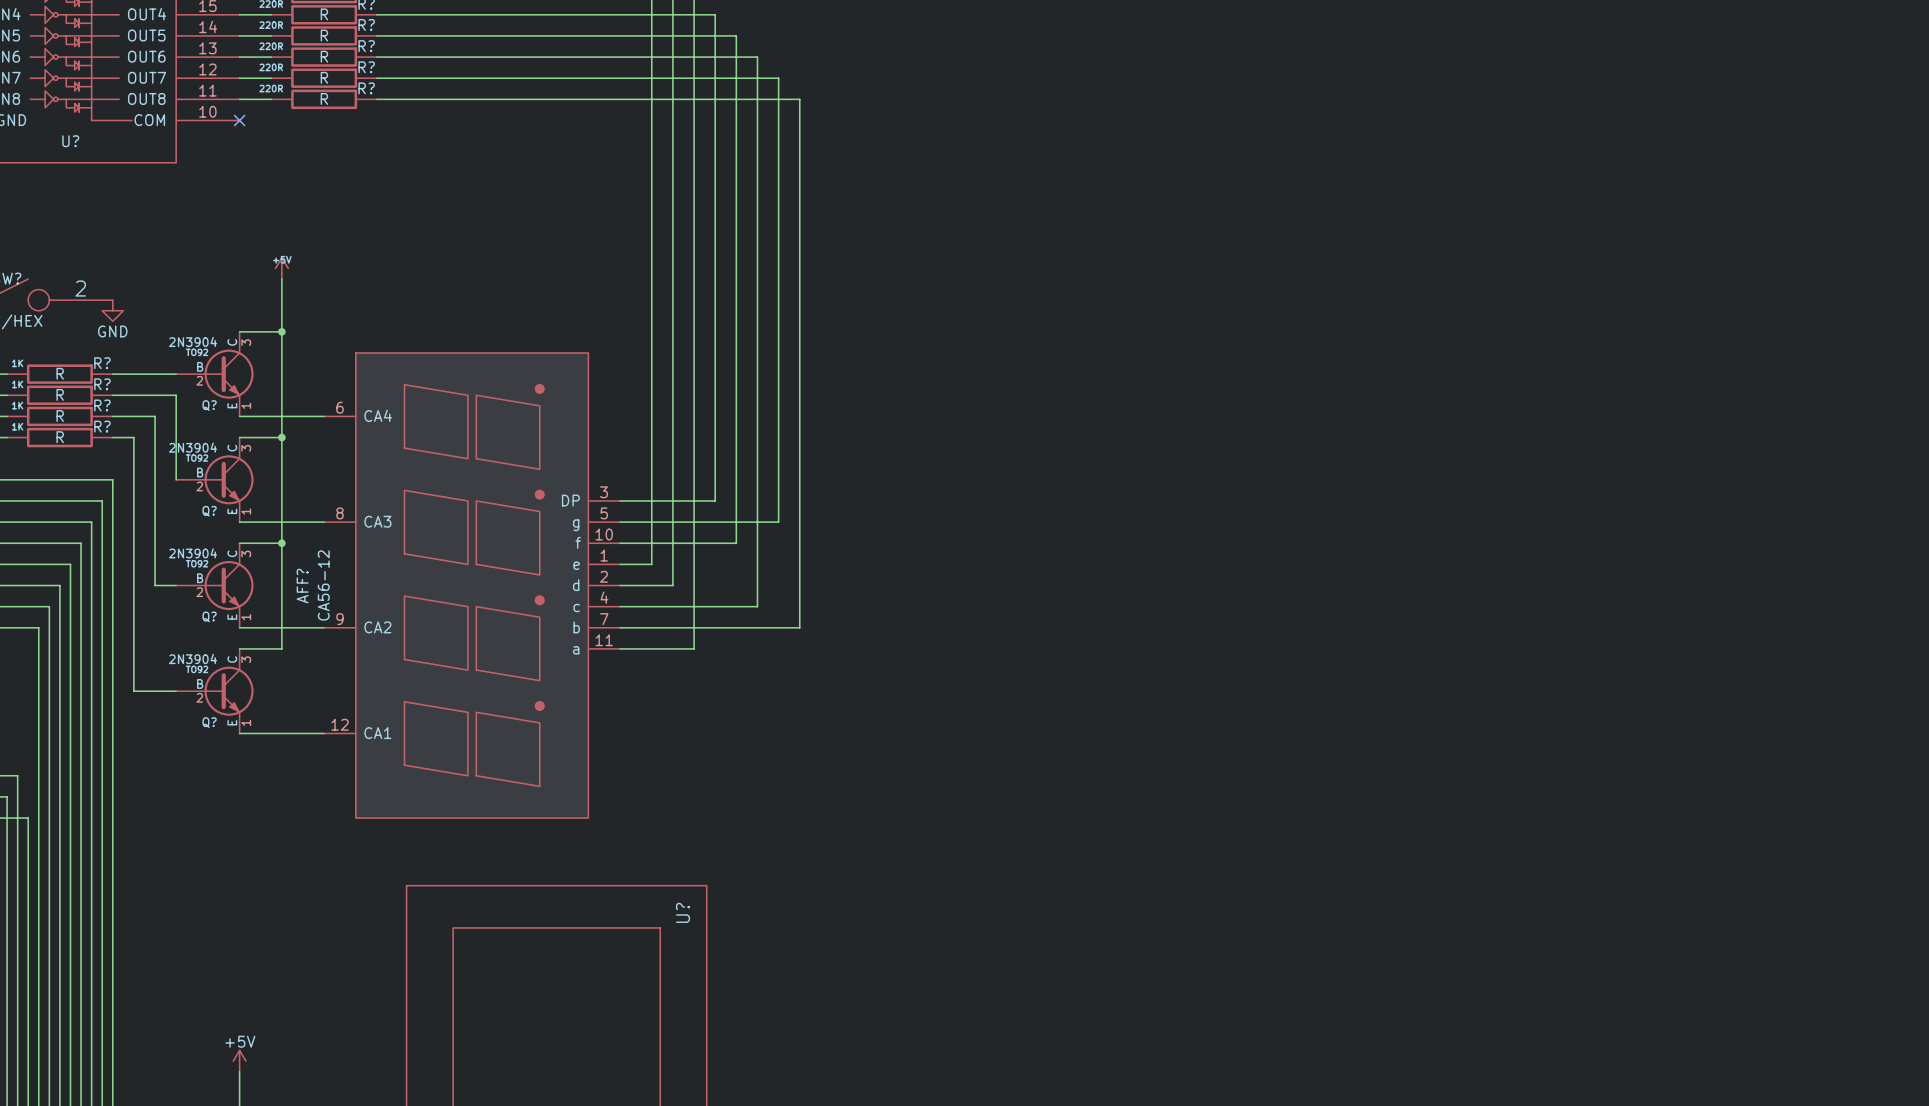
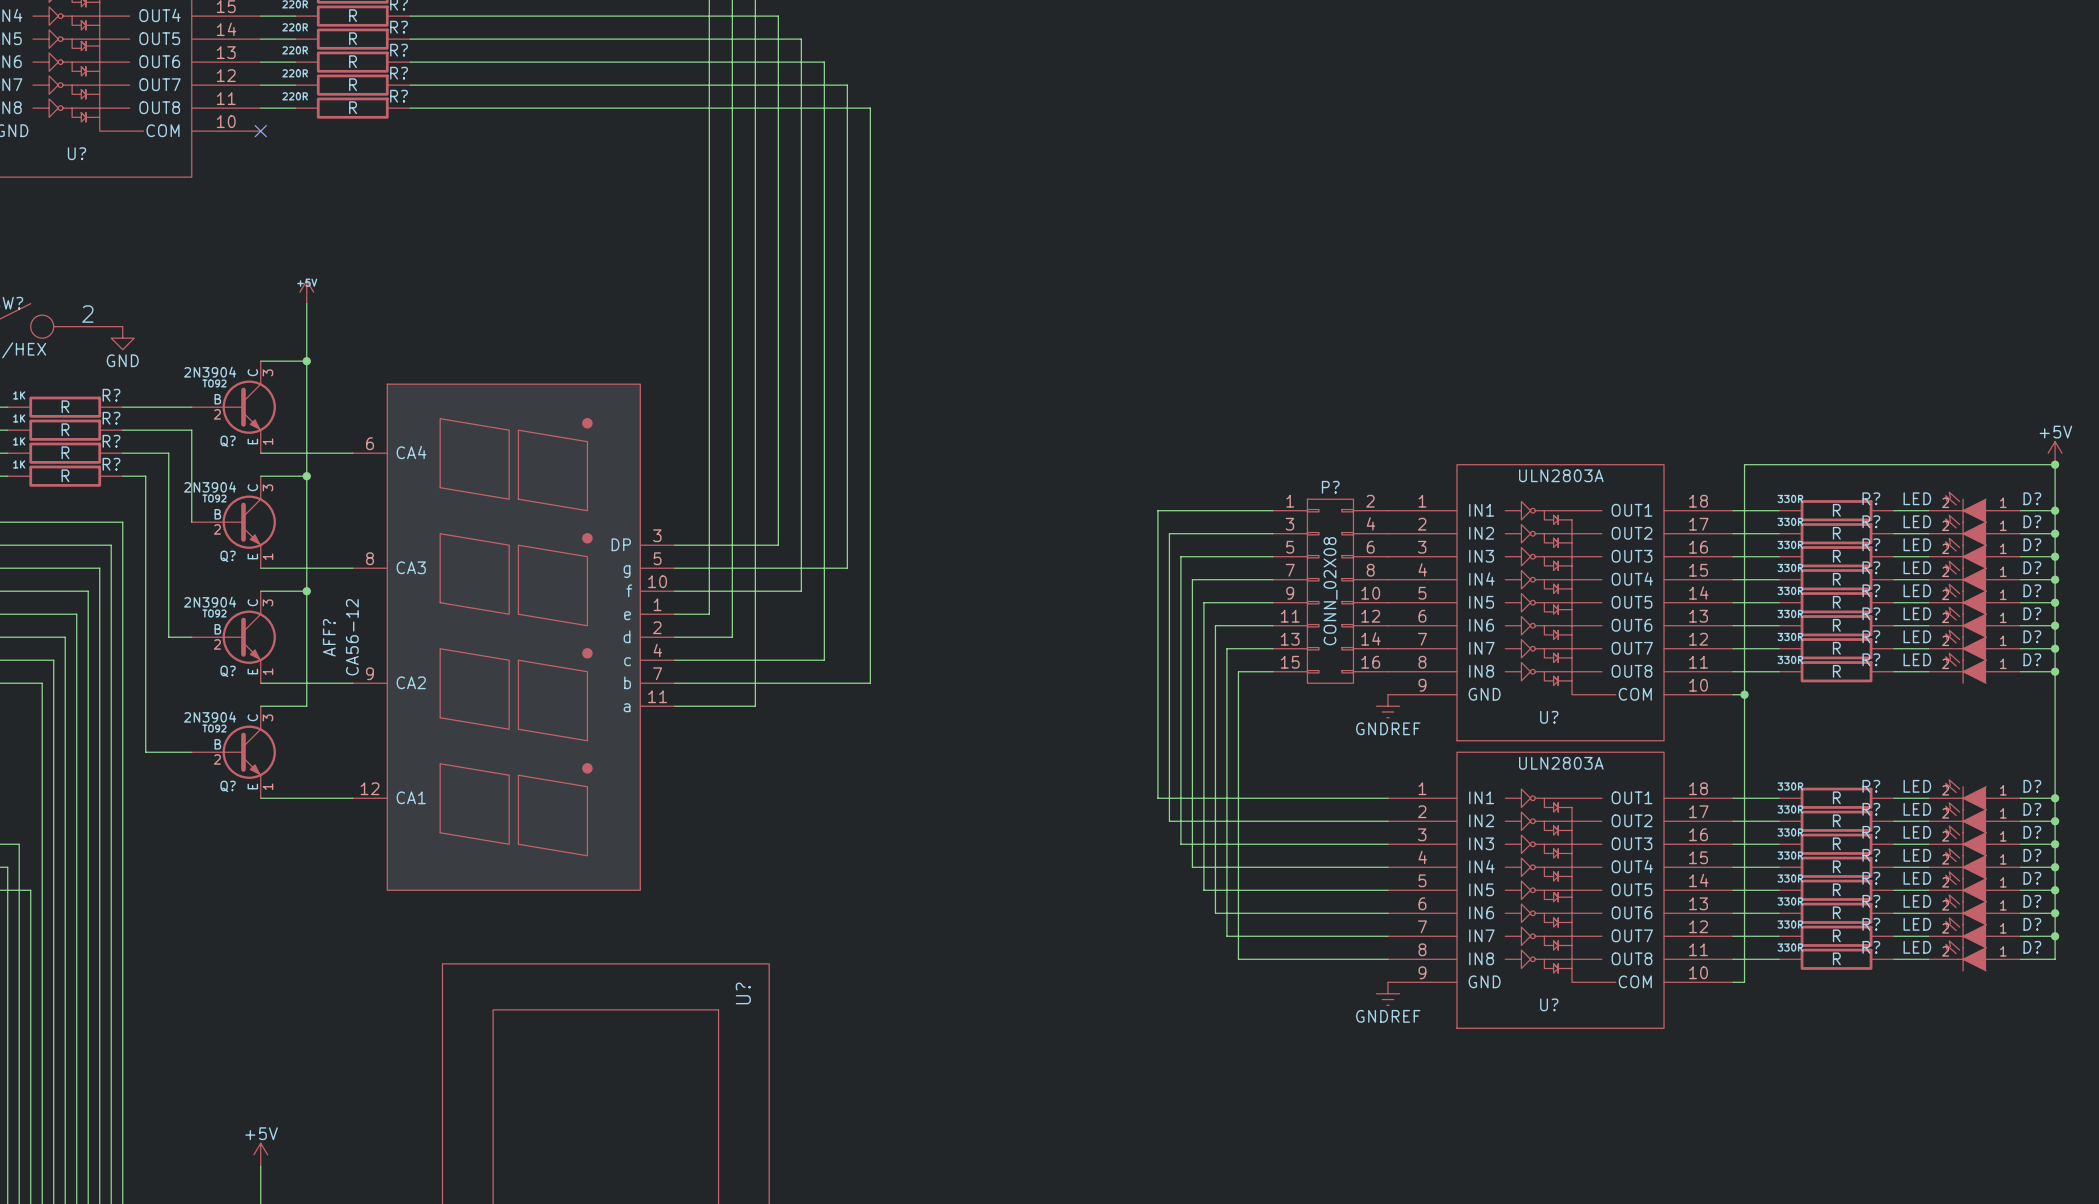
power symbol: none -> +5V (2055, 453)
junction: none -> (2055, 464)
D?: none -> LED (1974, 507)
wire: none -> (1272, 510) (1157, 510) (1157, 798) (1387, 798)
wire: none -> (1733, 510) (1779, 510)
R?: none -> R (1836, 510)
wire: none -> (1894, 510) (1928, 510)
wire: none -> (2020, 510) (2055, 510)
junction: none -> (2055, 510)
D?: none -> LED (1974, 530)
wire: none -> (1272, 533) (1169, 533) (1169, 821) (1387, 821)
wire: none -> (1733, 533) (1779, 533)
R?: none -> R (1836, 533)
wire: none -> (1894, 533) (1928, 533)
wire: none -> (2020, 533) (2055, 533)
junction: none -> (2055, 533)
D?: none -> LED (1974, 553)
wire: none -> (1272, 556) (1180, 556) (1180, 844) (1387, 844)
wire: none -> (1733, 556) (1779, 556)
R?: none -> R (1836, 556)
wire: none -> (1894, 556) (1928, 556)
wire: none -> (2020, 556) (2055, 556)
junction: none -> (2055, 556)
D?: none -> LED (1974, 576)
wire: none -> (1272, 579) (1192, 579) (1192, 867) (1387, 867)
wire: none -> (1733, 579) (1779, 579)
R?: none -> R (1836, 579)
wire: none -> (1894, 579) (1928, 579)
wire: none -> (2020, 579) (2055, 579)
junction: none -> (2055, 579)
P?: none -> CONN_02X08 (1330, 591)
D?: none -> LED (1974, 599)
wire: none -> (1272, 602) (1203, 602) (1203, 890) (1387, 890)
U?: none -> ULN2803A (1560, 602)
wire: none -> (1733, 602) (1779, 602)
R?: none -> R (1836, 602)
wire: none -> (1894, 602) (1928, 602)
wire: none -> (2020, 602) (2055, 602)
junction: none -> (2055, 602)
D?: none -> LED (1974, 622)
wire: none -> (1272, 625) (1215, 625) (1215, 913) (1387, 913)
wire: none -> (1733, 625) (1779, 625)
R?: none -> R (1836, 625)
wire: none -> (1894, 625) (1928, 625)
wire: none -> (2020, 625) (2055, 625)
junction: none -> (2055, 625)
D?: none -> LED (1974, 645)
wire: none -> (1272, 648) (1226, 648) (1226, 936) (1387, 936)
wire: none -> (1733, 648) (1779, 648)
R?: none -> R (1836, 648)
wire: none -> (1894, 648) (1928, 648)
wire: none -> (2020, 648) (2055, 648)
junction: none -> (2055, 648)
D?: none -> LED (1974, 668)
wire: none -> (1272, 671) (1238, 671) (1238, 959) (1387, 959)
wire: none -> (1733, 671) (1779, 671)
R?: none -> R (1836, 671)
wire: none -> (1894, 671) (1928, 671)
wire: none -> (2020, 671) (2055, 671)
junction: none -> (2055, 671)
wire: none -> (1733, 694) (1744, 694)
junction: none -> (1744, 694)
power symbol: none -> GNDREF (1387, 706)
D?: none -> LED (1974, 794)
wire: none -> (1733, 798) (1779, 798)
R?: none -> R (1836, 798)
wire: none -> (1894, 798) (1928, 798)
wire: none -> (2020, 798) (2055, 798)
junction: none -> (2055, 798)
D?: none -> LED (1974, 817)
wire: none -> (1733, 821) (1779, 821)
R?: none -> R (1836, 821)
wire: none -> (1894, 821) (1928, 821)
wire: none -> (2020, 821) (2055, 821)
junction: none -> (2055, 821)
D?: none -> LED (1974, 840)
wire: none -> (1733, 844) (1779, 844)
R?: none -> R (1836, 844)
wire: none -> (1894, 844) (1928, 844)
wire: none -> (2020, 844) (2055, 844)
junction: none -> (2055, 844)
D?: none -> LED (1974, 863)
wire: none -> (1733, 867) (1779, 867)
R?: none -> R (1836, 867)
wire: none -> (1894, 867) (1928, 867)
wire: none -> (2020, 867) (2055, 867)
junction: none -> (2055, 867)
D?: none -> LED (1974, 886)
U?: none -> ULN2803A (1560, 890)
wire: none -> (1733, 890) (1779, 890)
R?: none -> R (1836, 890)
wire: none -> (1894, 890) (1928, 890)
wire: none -> (2020, 890) (2055, 890)
junction: none -> (2055, 890)
D?: none -> LED (1974, 909)
wire: none -> (1733, 913) (1779, 913)
R?: none -> R (1836, 913)
wire: none -> (1894, 913) (1928, 913)
wire: none -> (2020, 913) (2055, 913)
junction: none -> (2055, 913)
D?: none -> LED (1974, 932)
wire: none -> (1733, 936) (1779, 936)
R?: none -> R (1836, 936)
wire: none -> (1894, 936) (1928, 936)
wire: none -> (2020, 936) (2055, 936)
junction: none -> (2055, 936)
D?: none -> LED (1974, 955)
wire: none -> (1733, 959) (1779, 959)
R?: none -> R (1836, 959)
wire: none -> (1894, 959) (1928, 959)
wire: none -> (2020, 959) (2055, 959) (2055, 464) (1744, 464) (1744, 982) (1733, 982)
power symbol: none -> GNDREF (1387, 993)

